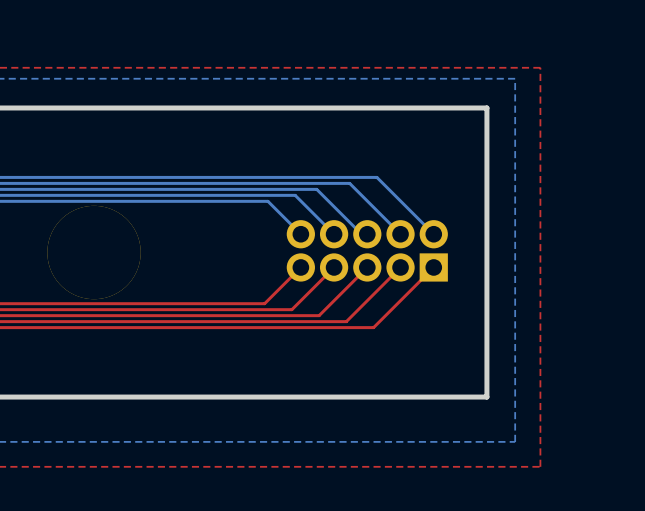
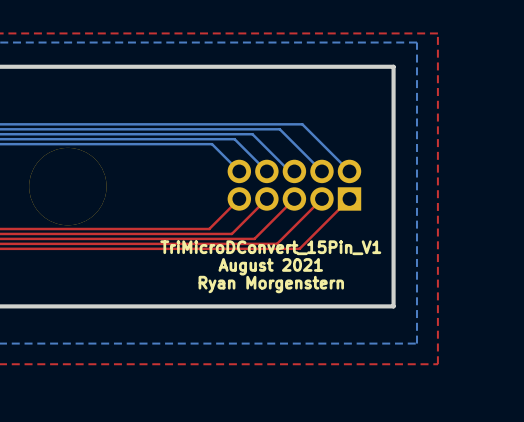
text: none -> TriMicroDConvert_15Pin_V1 (270, 247)
text: none -> August 2021 (270, 266)
text: none -> Ryan Morgenstern (271, 284)

